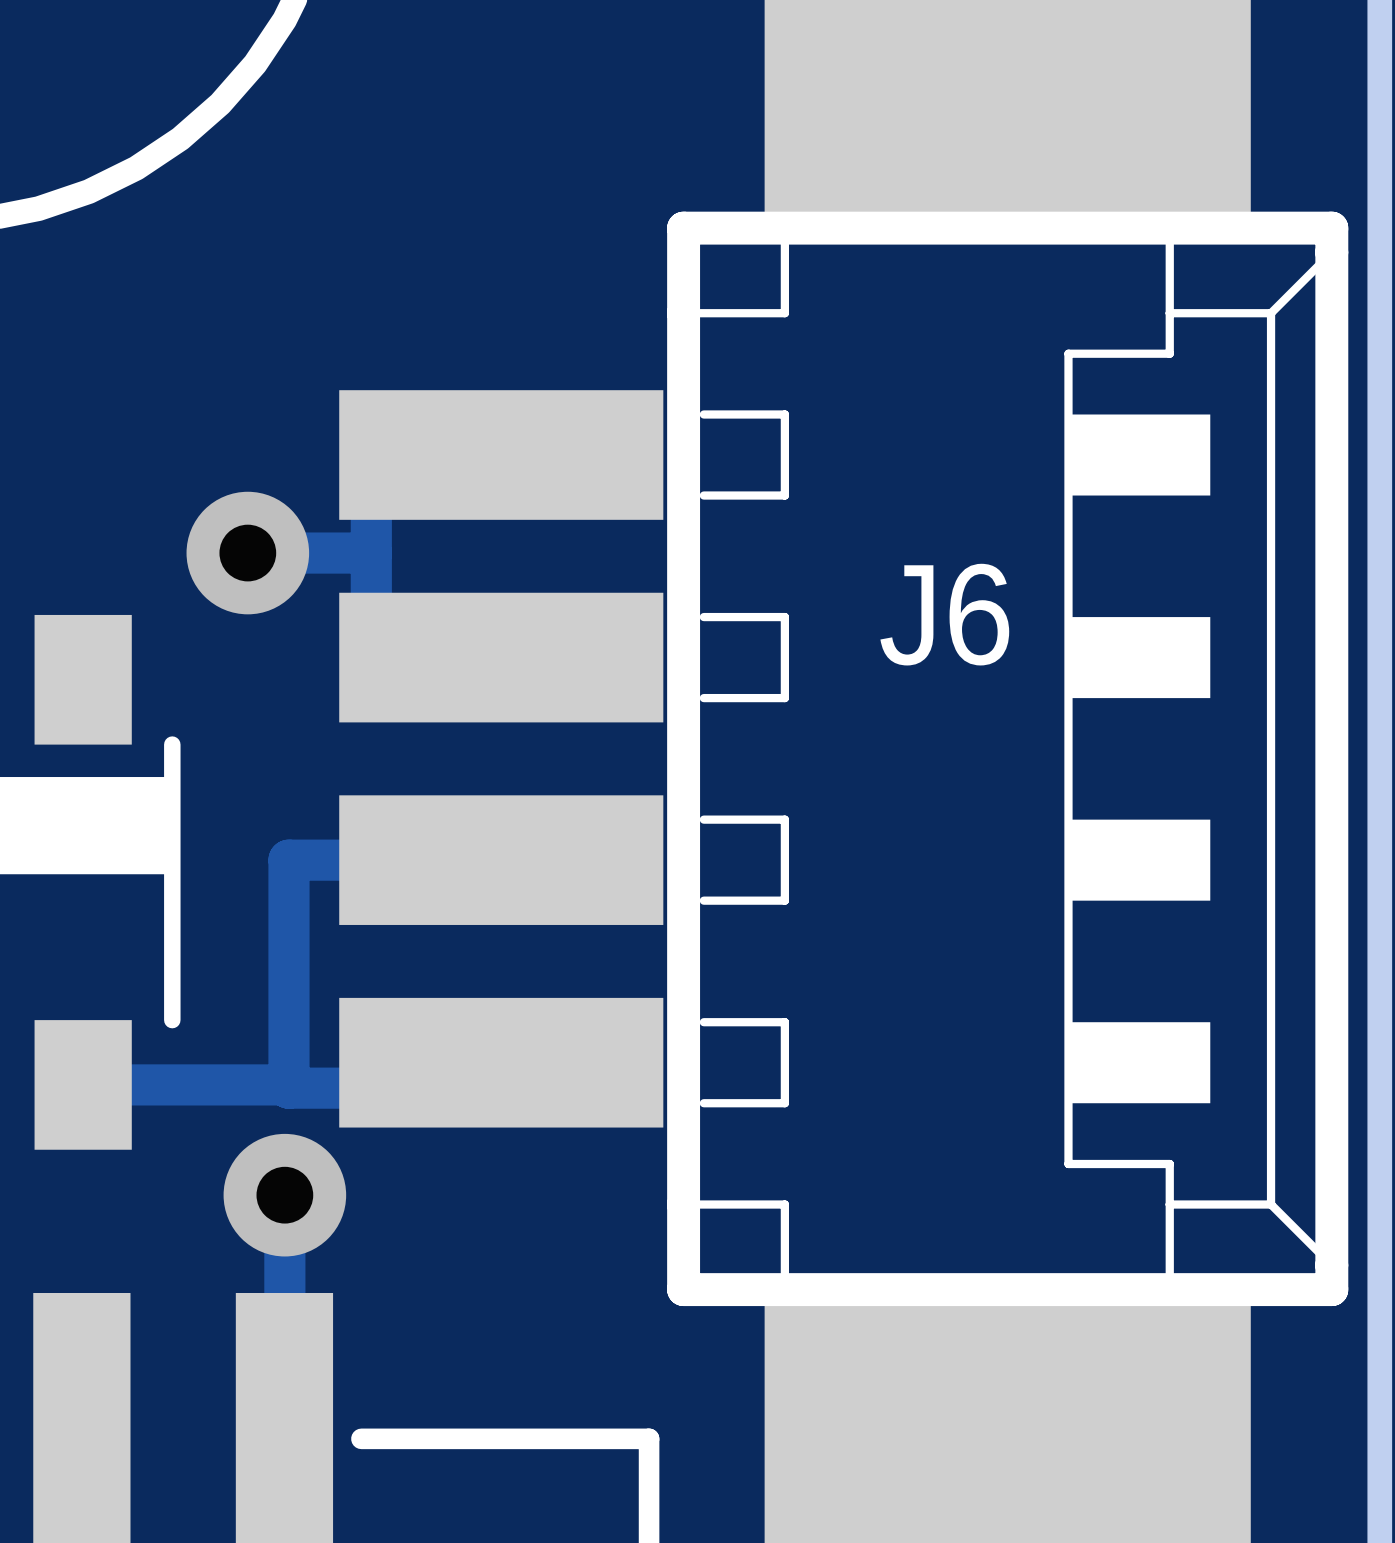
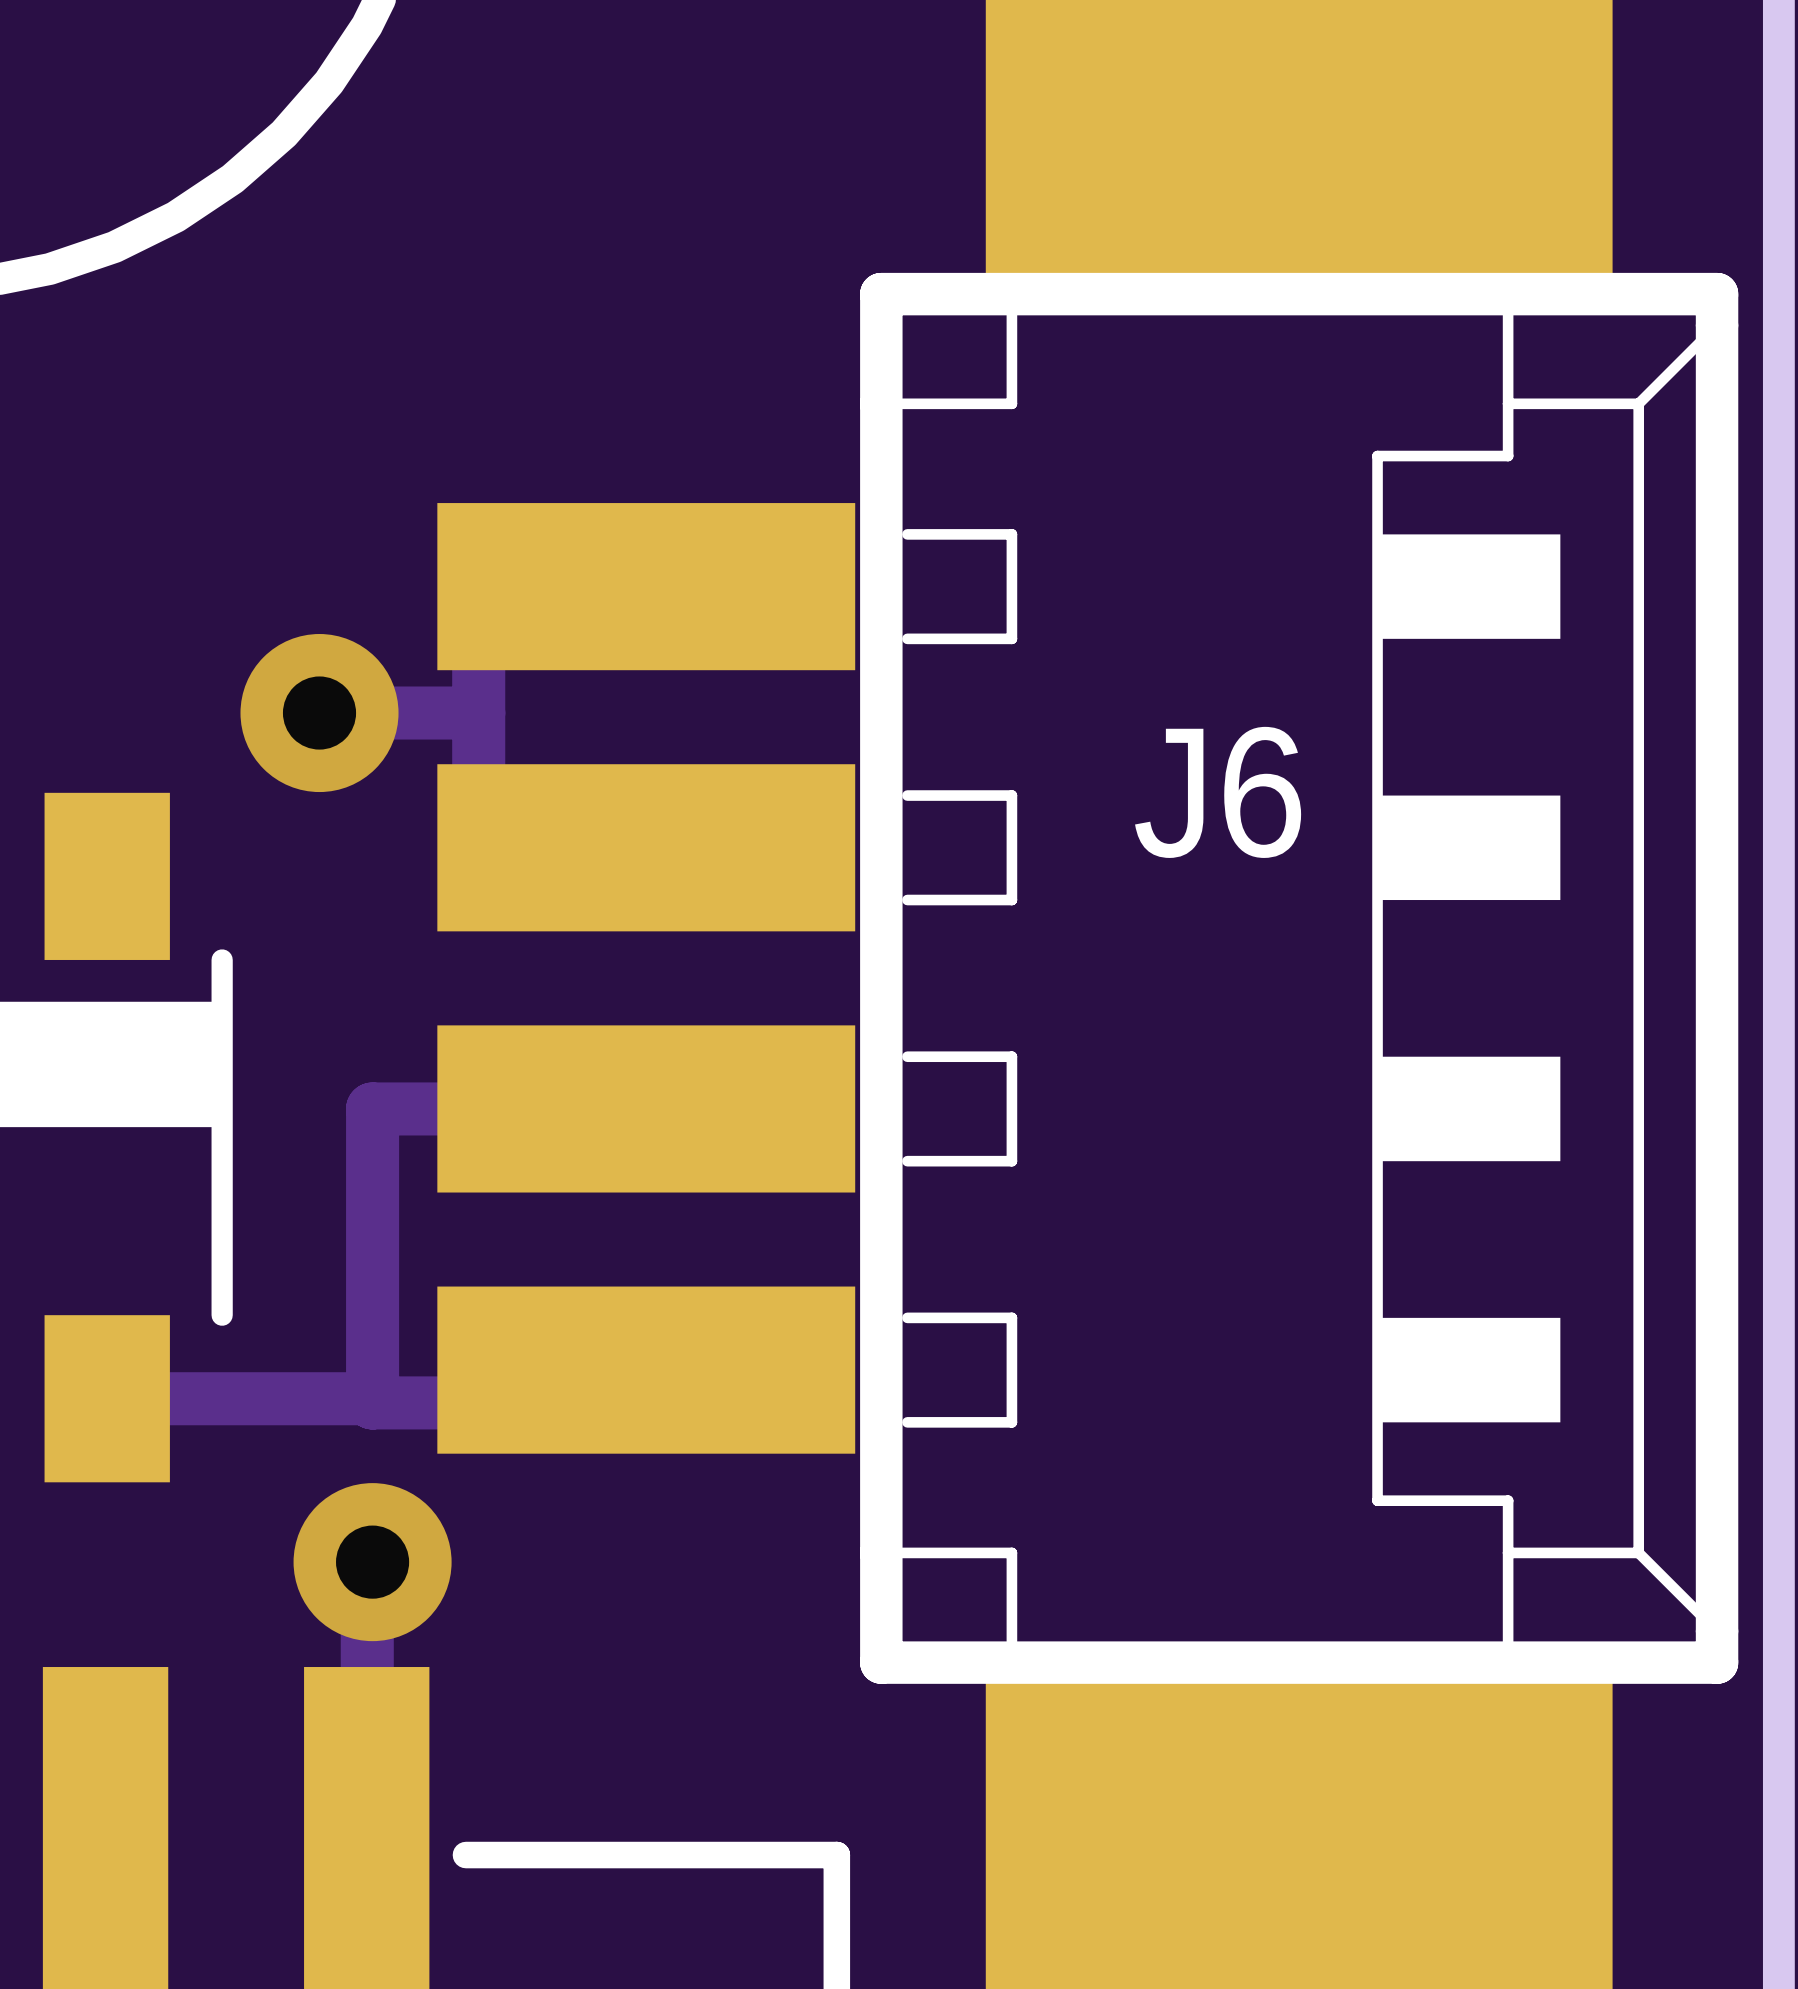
via position: (284, 1195) -> (372, 1562)

